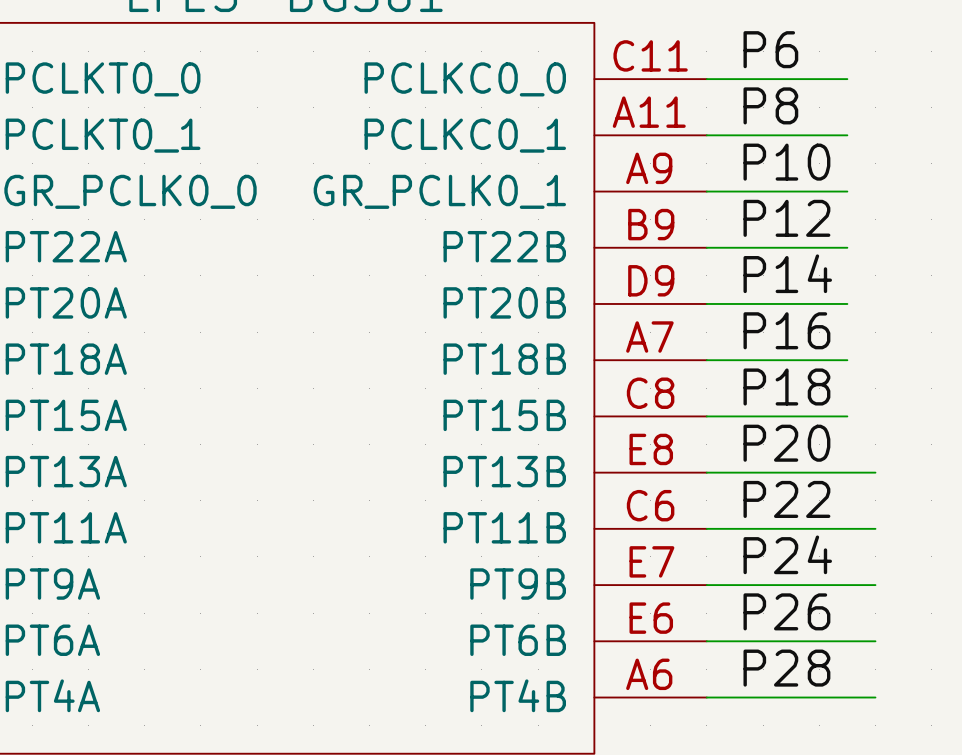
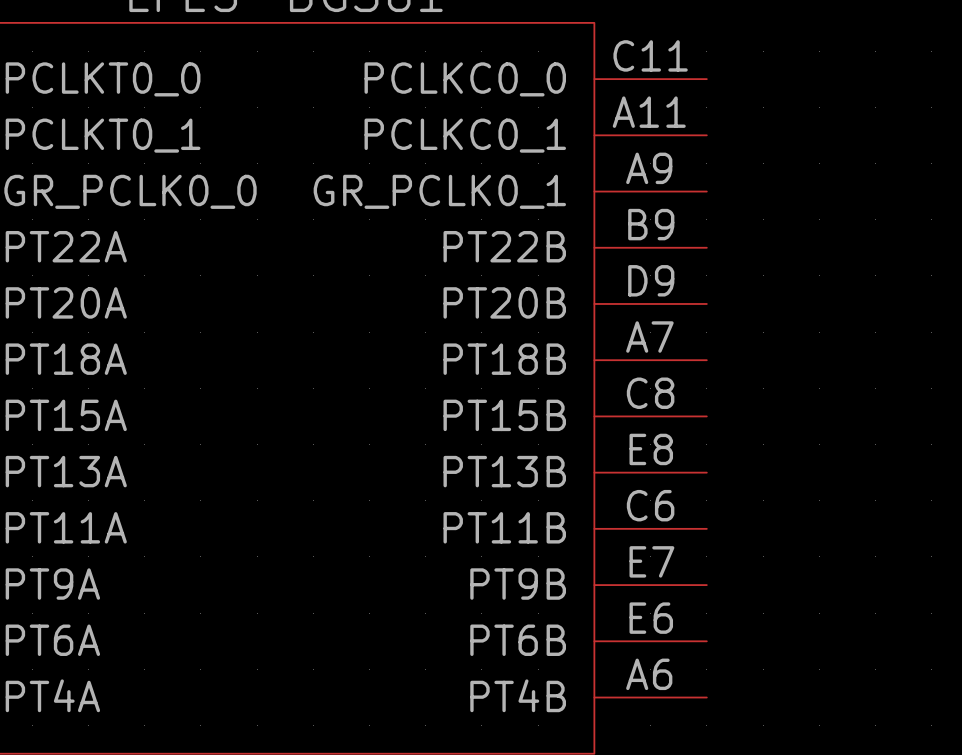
label: P6 (770, 49) -> none
wire: (706, 79) (847, 79) -> none
label: P8 (770, 105) -> none
wire: (706, 135) (847, 135) -> none
label: P10 (786, 162) -> none
wire: (706, 191) (847, 191) -> none
label: P12 (786, 218) -> none
wire: (706, 247) (847, 247) -> none
label: P14 (787, 273) -> none
wire: (706, 303) (847, 303) -> none
label: P16 (786, 330) -> none
wire: (706, 360) (847, 360) -> none
label: P18 (786, 386) -> none
wire: (706, 416) (847, 416) -> none
label: P20 (786, 443) -> none
wire: (706, 472) (875, 472) -> none
label: P22 (786, 499) -> none
wire: (706, 528) (875, 528) -> none
label: P24 (787, 554) -> none
wire: (706, 585) (875, 585) -> none
label: P26 (786, 611) -> none
wire: (706, 641) (875, 641) -> none
label: P28 (786, 668) -> none
wire: (706, 697) (875, 697) -> none

